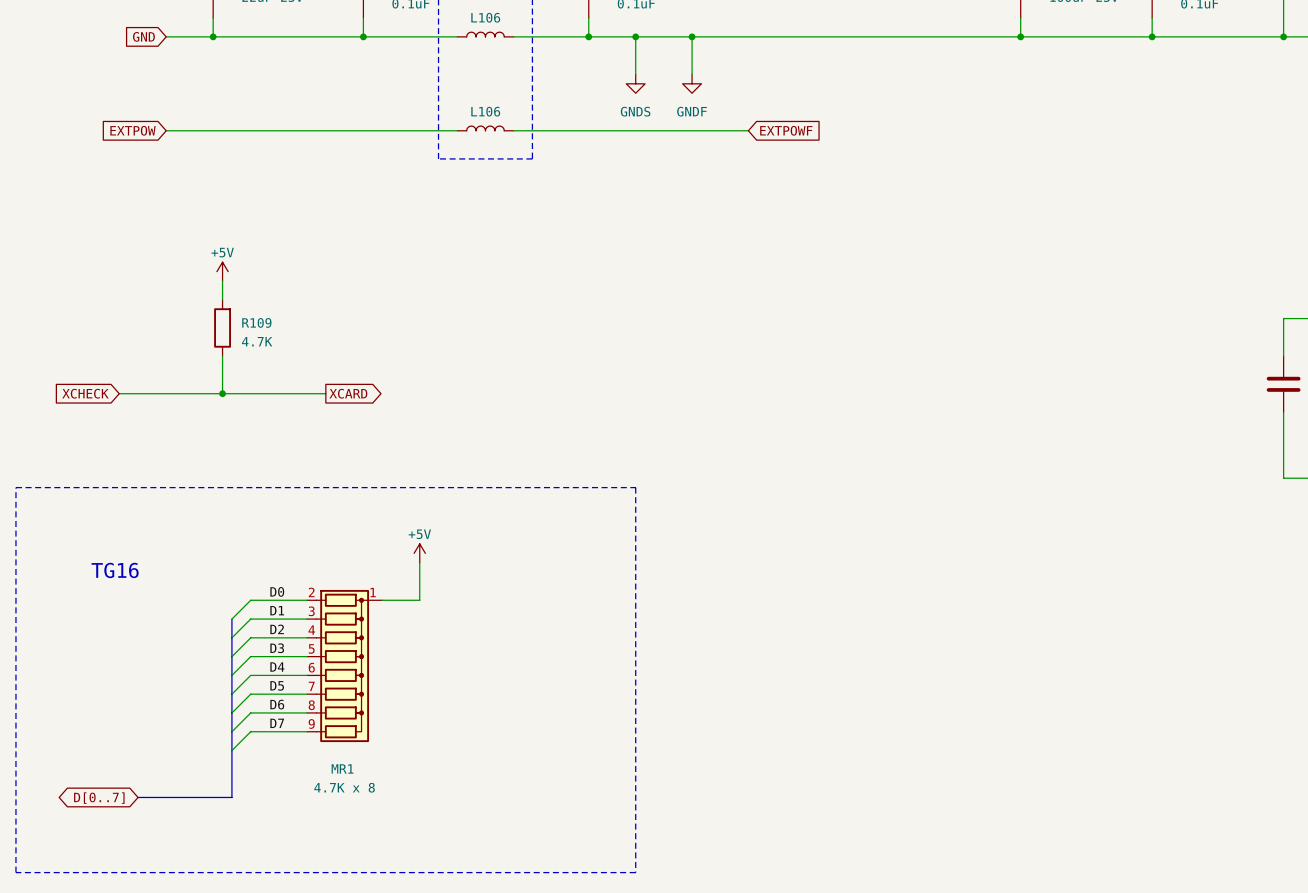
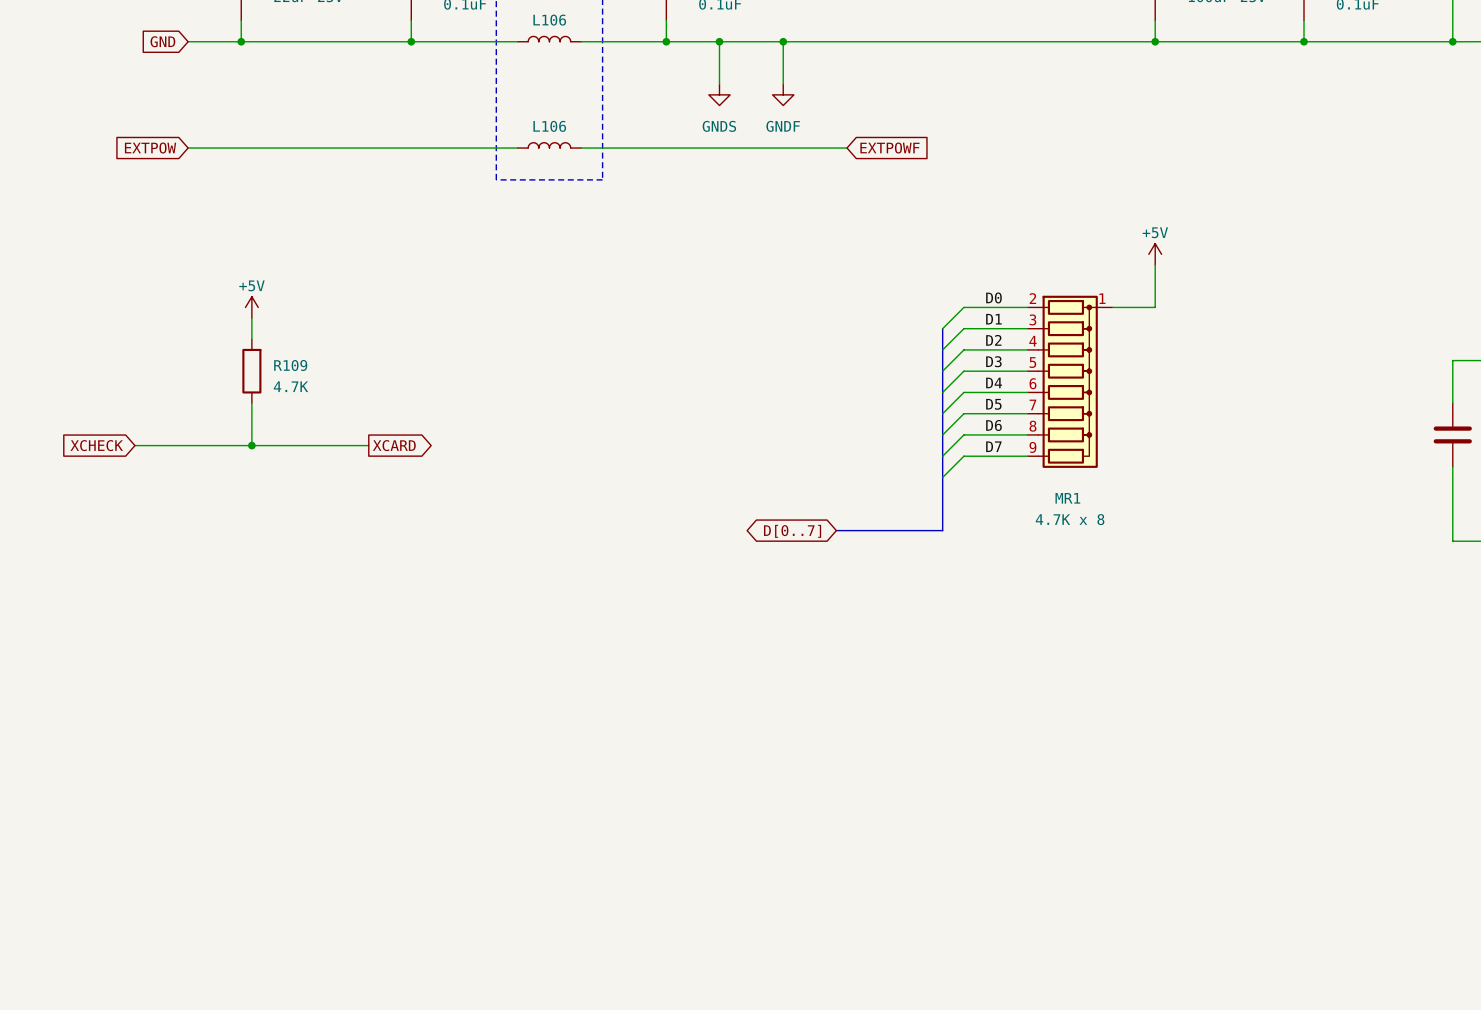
power symbol: none -> +5V (1155, 254)
wire: none -> (1155, 264) (1155, 307) (1112, 307)
label: none -> D0 (993, 297)
wire: none -> (1027, 307) (963, 307) (942, 328)
label: none -> D1 (993, 319)
bus: none -> (942, 328) (942, 530) (836, 530)
wire: none -> (1027, 328) (963, 328) (942, 349)
label: none -> D2 (993, 340)
wire: none -> (1027, 349) (963, 349) (942, 371)
label: none -> D3 (993, 361)
wire: none -> (1027, 371) (963, 371) (942, 392)
label: none -> D4 (994, 382)
wire: none -> (1027, 392) (963, 392) (942, 413)
label: none -> D5 (993, 404)
wire: none -> (1027, 413) (963, 413) (942, 434)
label: none -> D6 (993, 425)
wire: none -> (1027, 434) (963, 434) (942, 456)
label: none -> D7 (993, 446)
wire: none -> (1027, 456) (963, 456) (942, 477)
global label: none -> D[0..7] (792, 531)
line: (15, 487) (635, 487) (635, 872) (15, 872) (15, 487) -> none
power symbol: +5V (419, 553) -> none
wire: (419, 562) (419, 600) (382, 600) -> none
text: TG16 (115, 570) -> none
label: D0 (277, 591) -> none
wire: (307, 600) (250, 600) (231, 619) -> none
label: D1 (277, 610) -> none
bus: (231, 619) (231, 797) (138, 797) -> none
wire: (307, 619) (250, 619) (231, 637) -> none
label: D2 (277, 629) -> none
wire: (307, 637) (250, 637) (231, 656) -> none
label: D3 (277, 648) -> none
wire: (307, 656) (250, 656) (231, 675) -> none
MR1 position: (344, 666) -> (1070, 381)
label: D4 (277, 667) -> none
wire: (307, 675) (250, 675) (231, 694) -> none
label: D5 (277, 685) -> none
wire: (307, 694) (250, 694) (231, 712) -> none
label: D6 (277, 704) -> none
wire: (307, 712) (250, 712) (231, 731) -> none
label: D7 (277, 723) -> none
wire: (307, 731) (250, 731) (231, 750) -> none
global label: D[0..7] (99, 798) -> none

